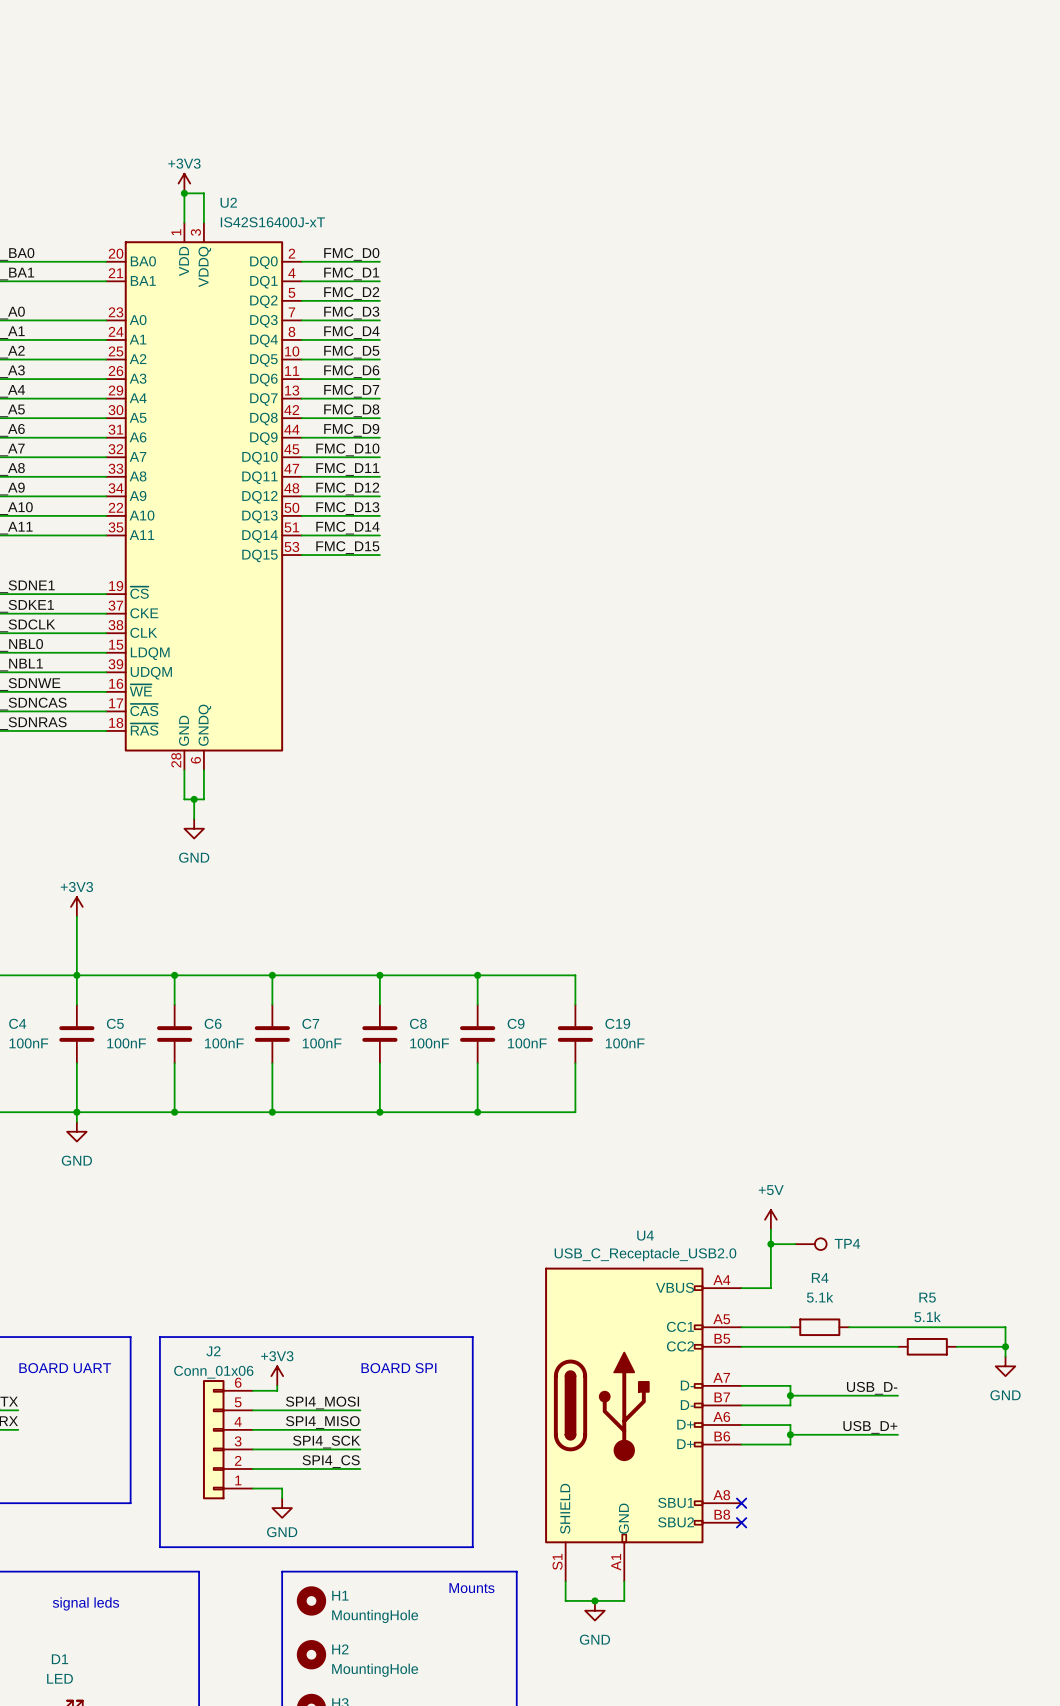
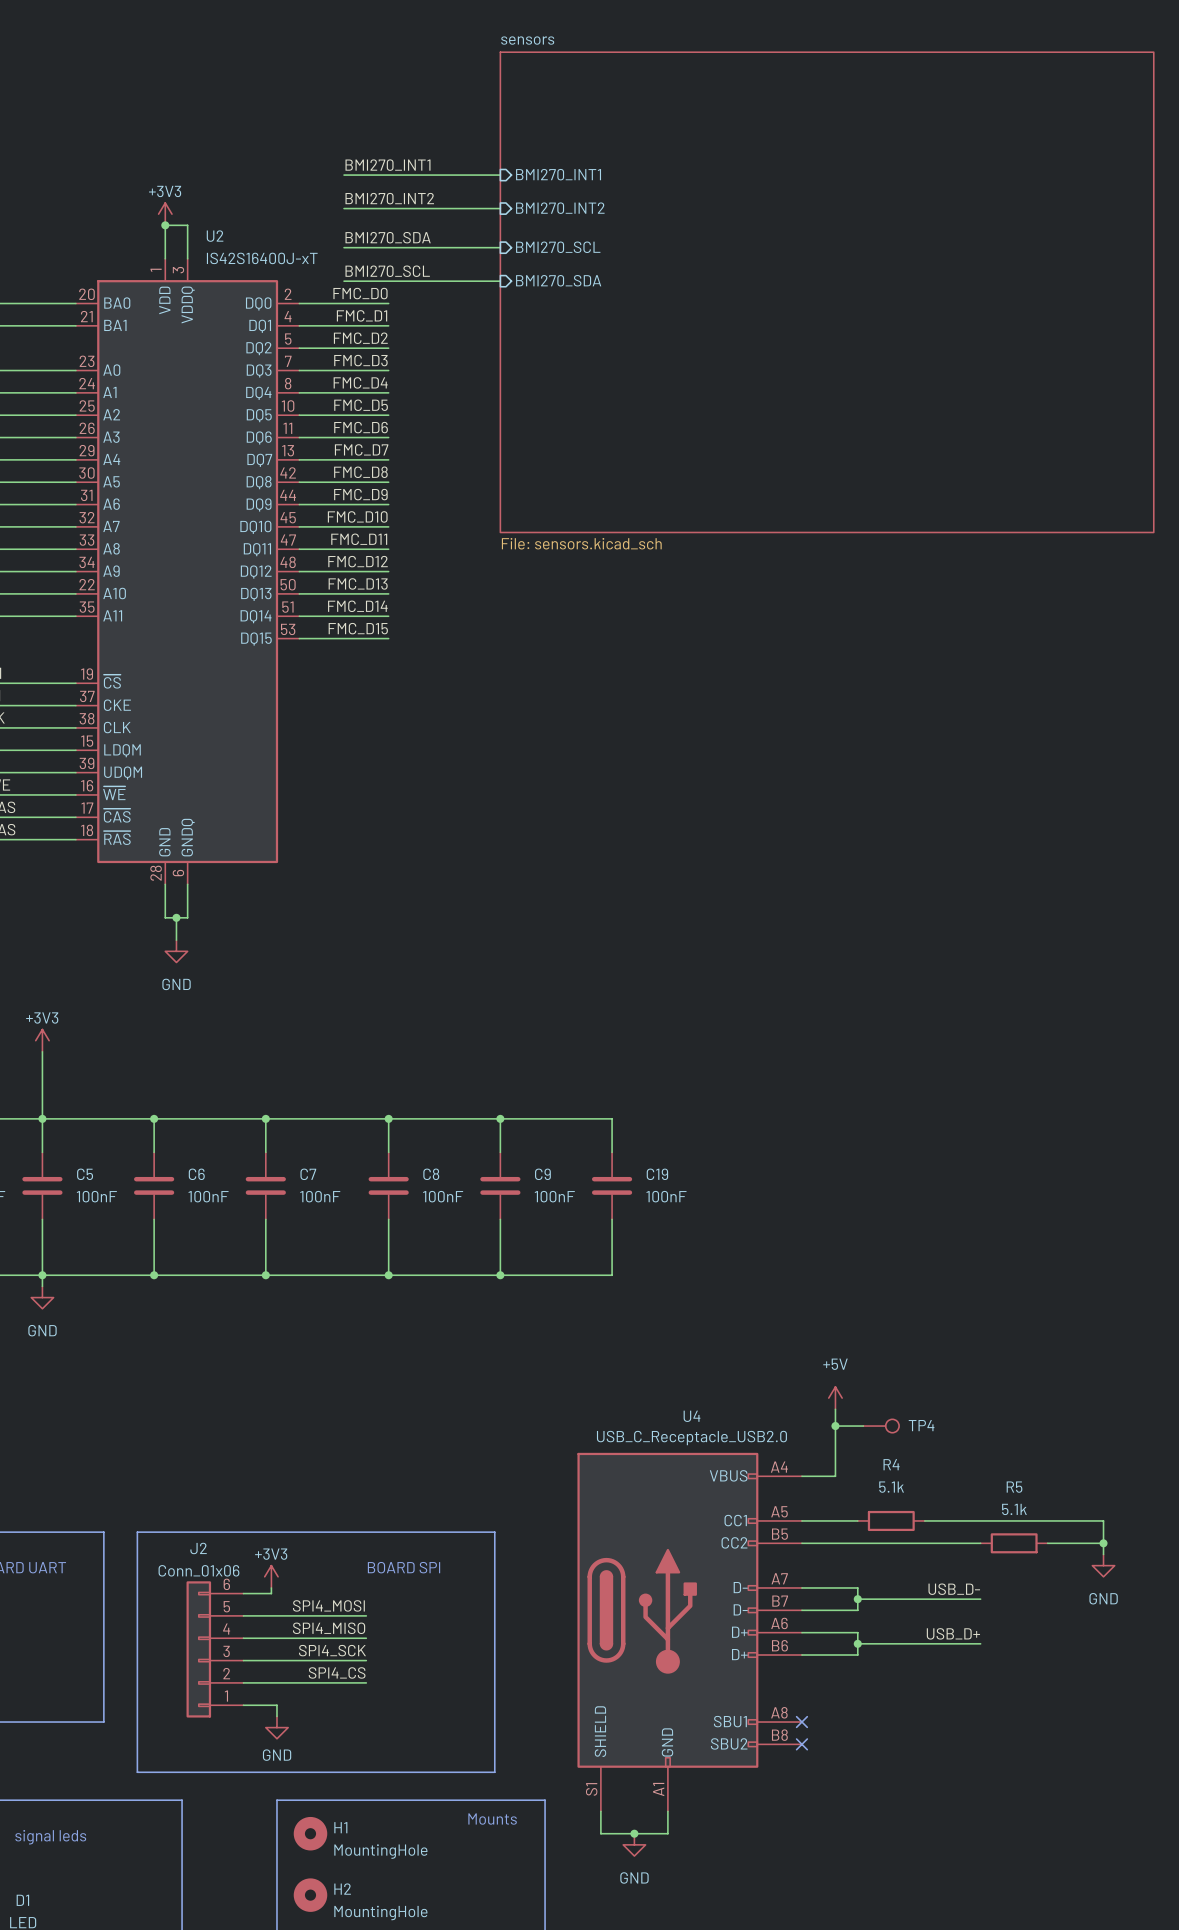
label: none -> BMI270_INT1 (387, 165)
wire: none -> (344, 175) (500, 175)
sheet pin: none -> BMI270_INT1 (558, 174)
label: none -> BMI270_INT2 (389, 198)
wire: none -> (344, 208) (500, 208)
sheet pin: none -> BMI270_INT2 (560, 208)
label: none -> BMI270_SDA (388, 237)
wire: none -> (344, 247) (500, 247)
sheet pin: none -> BMI270_SCL (558, 247)
label: none -> BMI270_SCL (387, 271)
wire: none -> (344, 281) (500, 281)
sheet pin: none -> BMI270_SDA (558, 280)
sheet sensors: none -> File: sensors.kicad_sch (827, 292)

